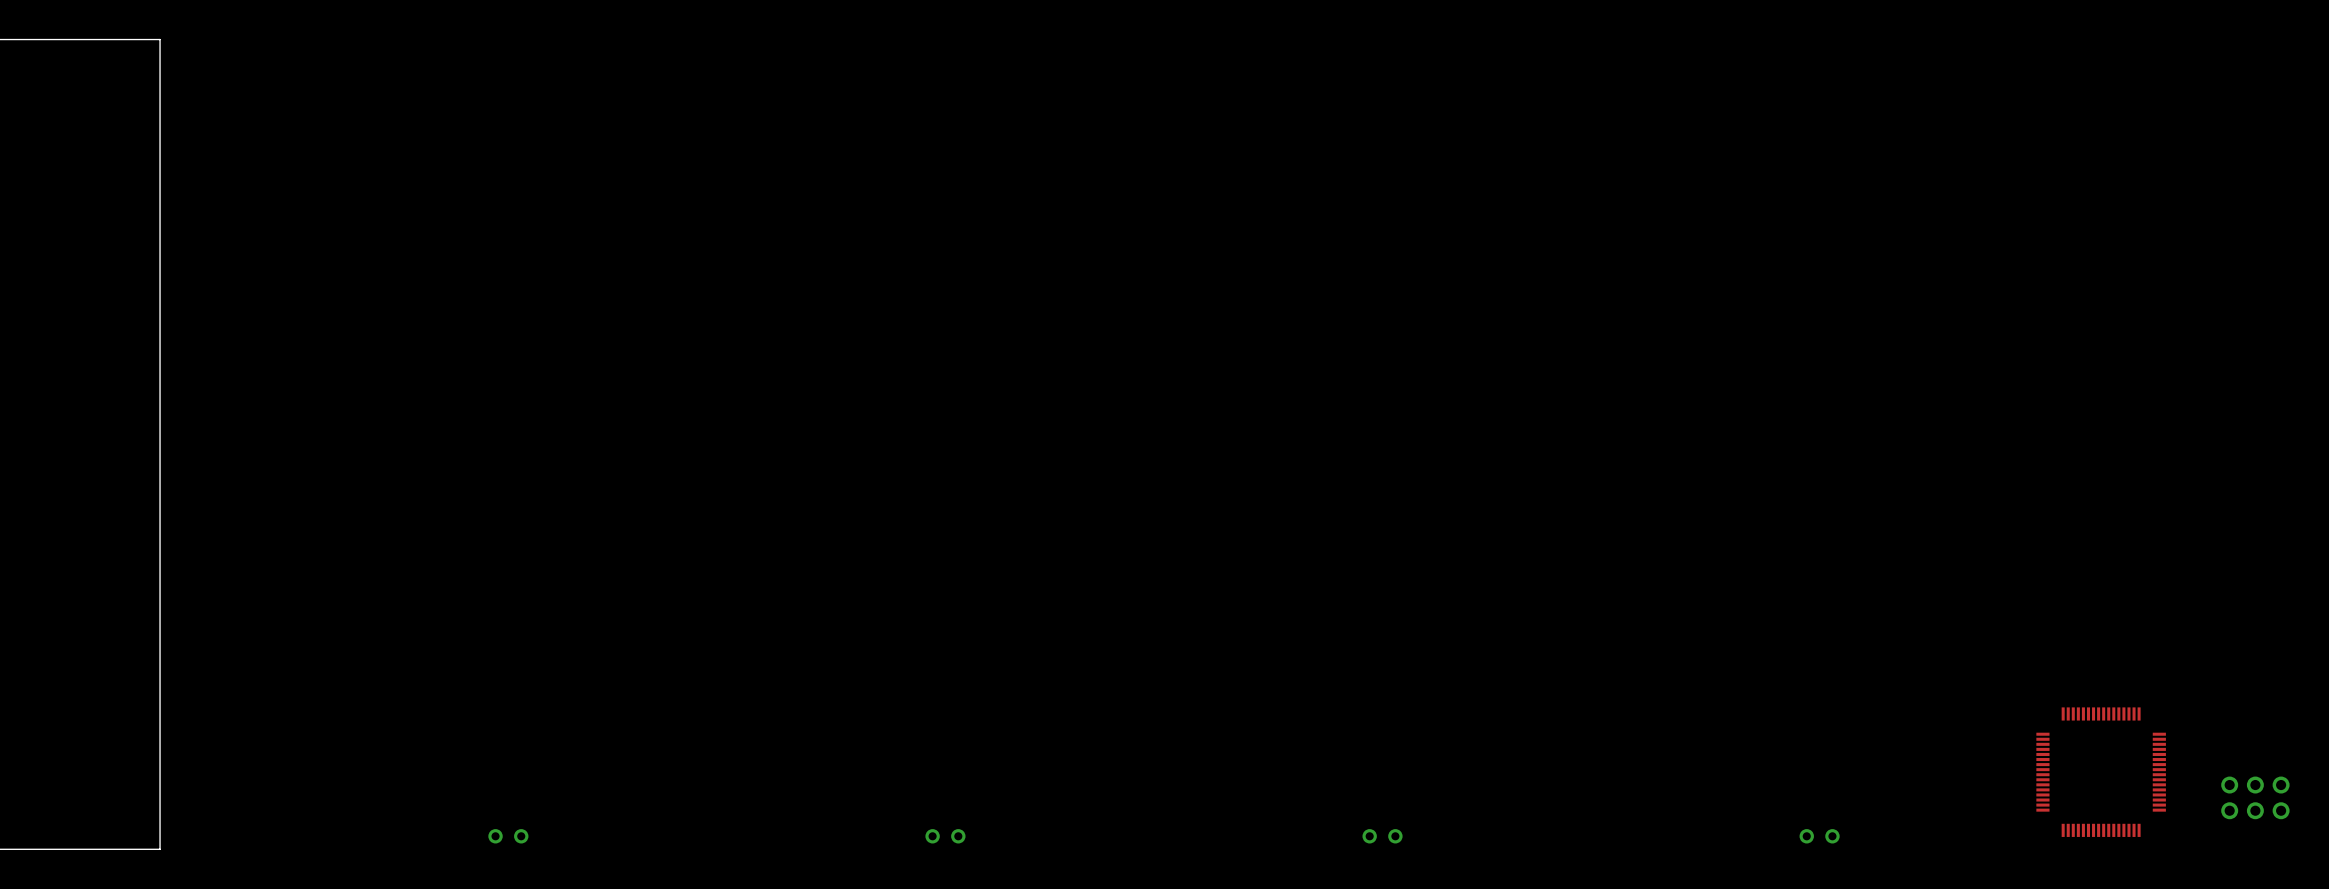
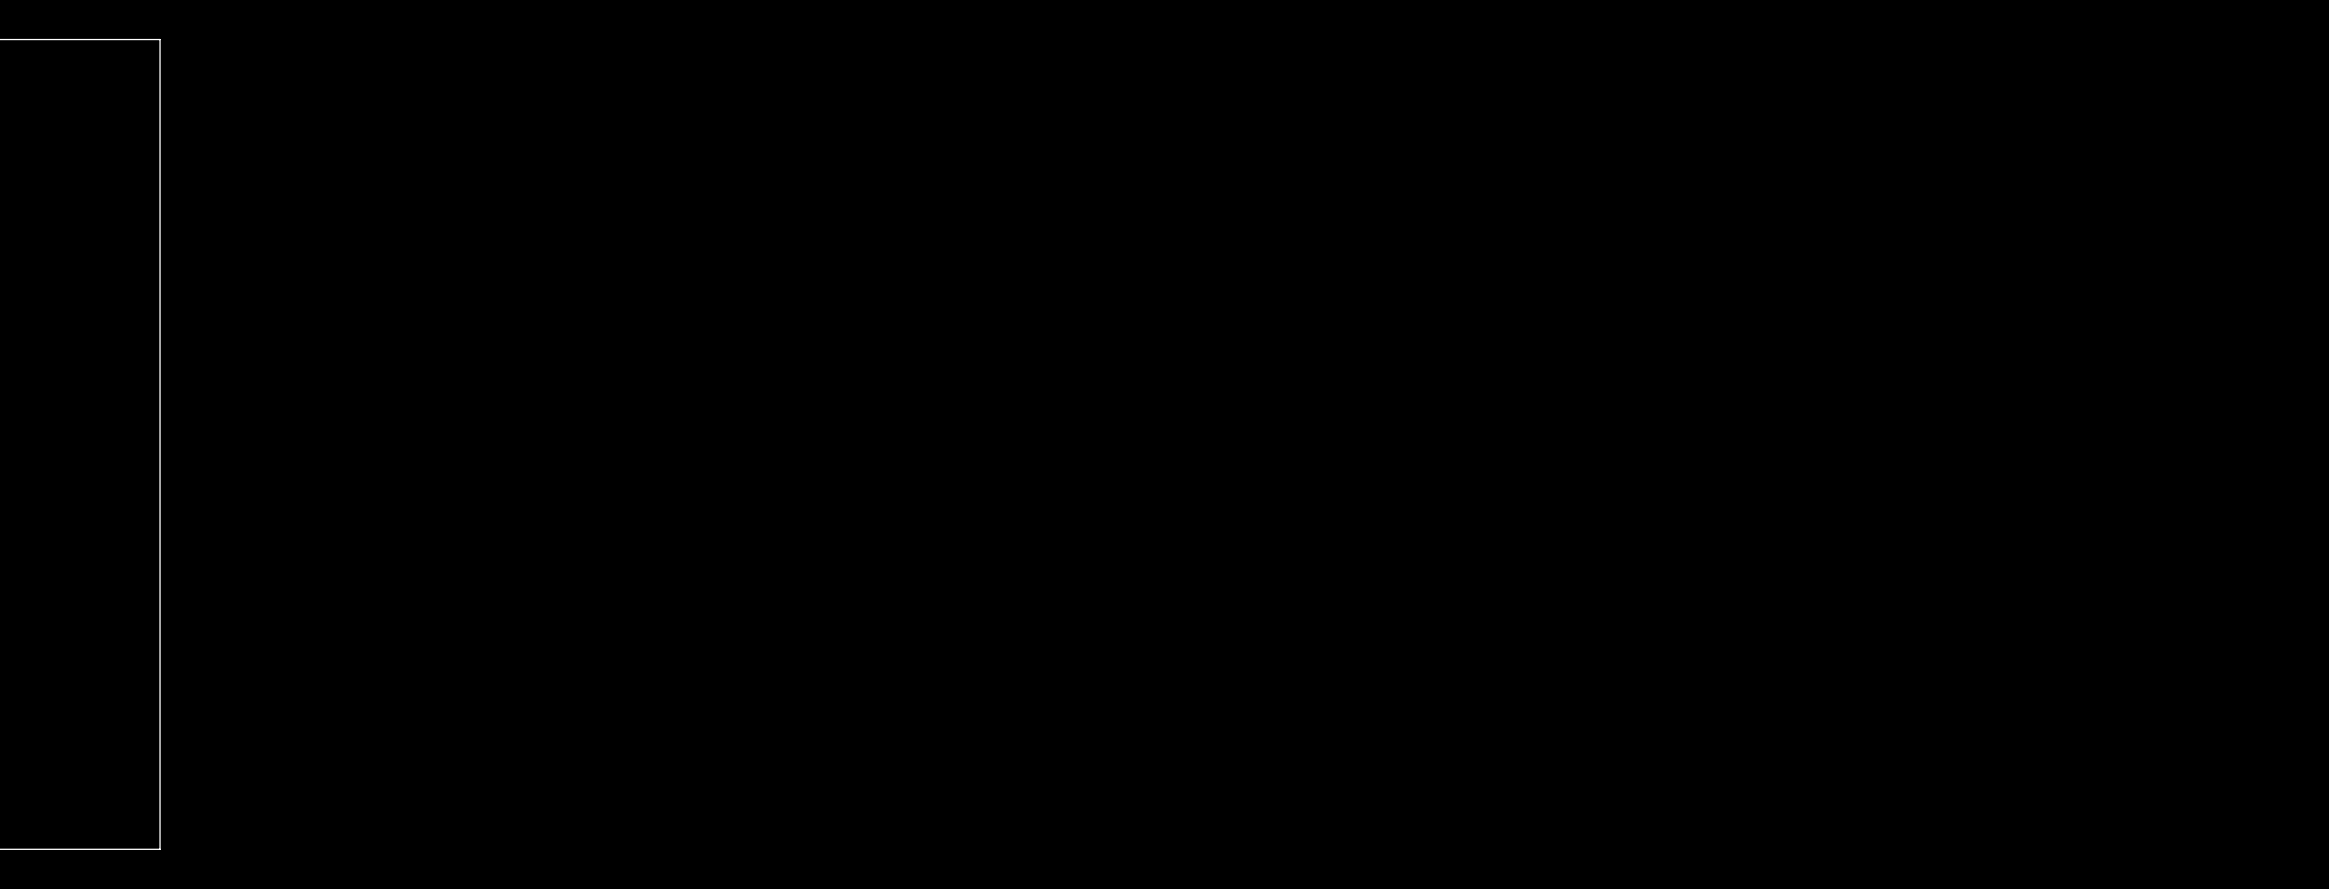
part: (2101, 772) -> none
part: (2255, 797) -> none
part: (508, 836) -> none
part: (945, 836) -> none
part: (1382, 836) -> none
part: (1819, 836) -> none

